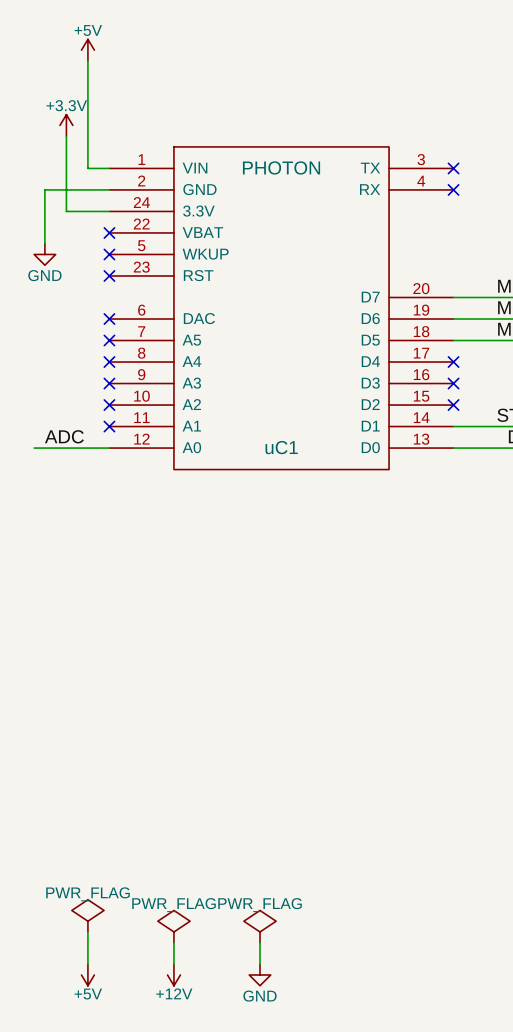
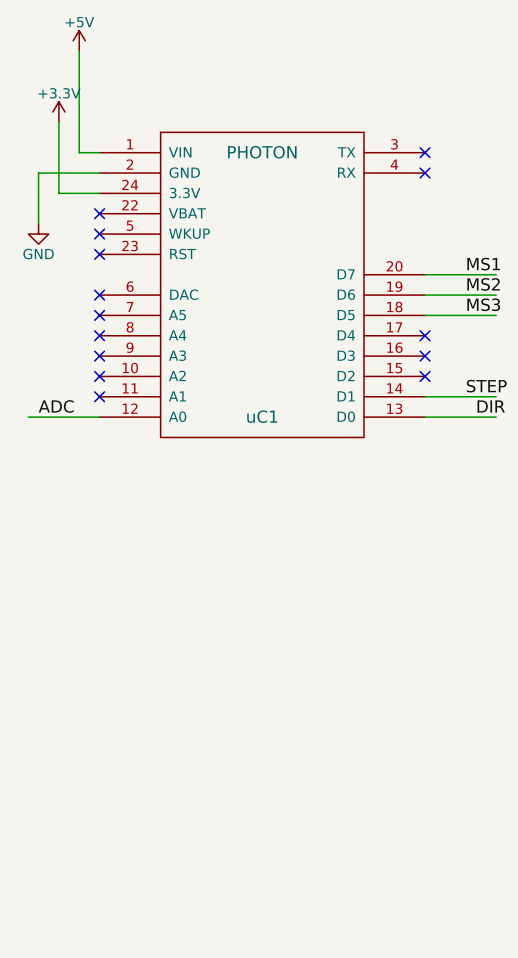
power symbol: PWR_FLAG (87, 915) -> none
power symbol: PWR_FLAG (173, 926) -> none
power symbol: PWR_FLAG (259, 926) -> none
wire: (87, 931) (87, 964) -> none
wire: (173, 942) (173, 964) -> none
wire: (259, 942) (259, 964) -> none
power symbol: +5V (87, 974) -> none
power symbol: +12V (173, 974) -> none
power symbol: GND (259, 974) -> none

